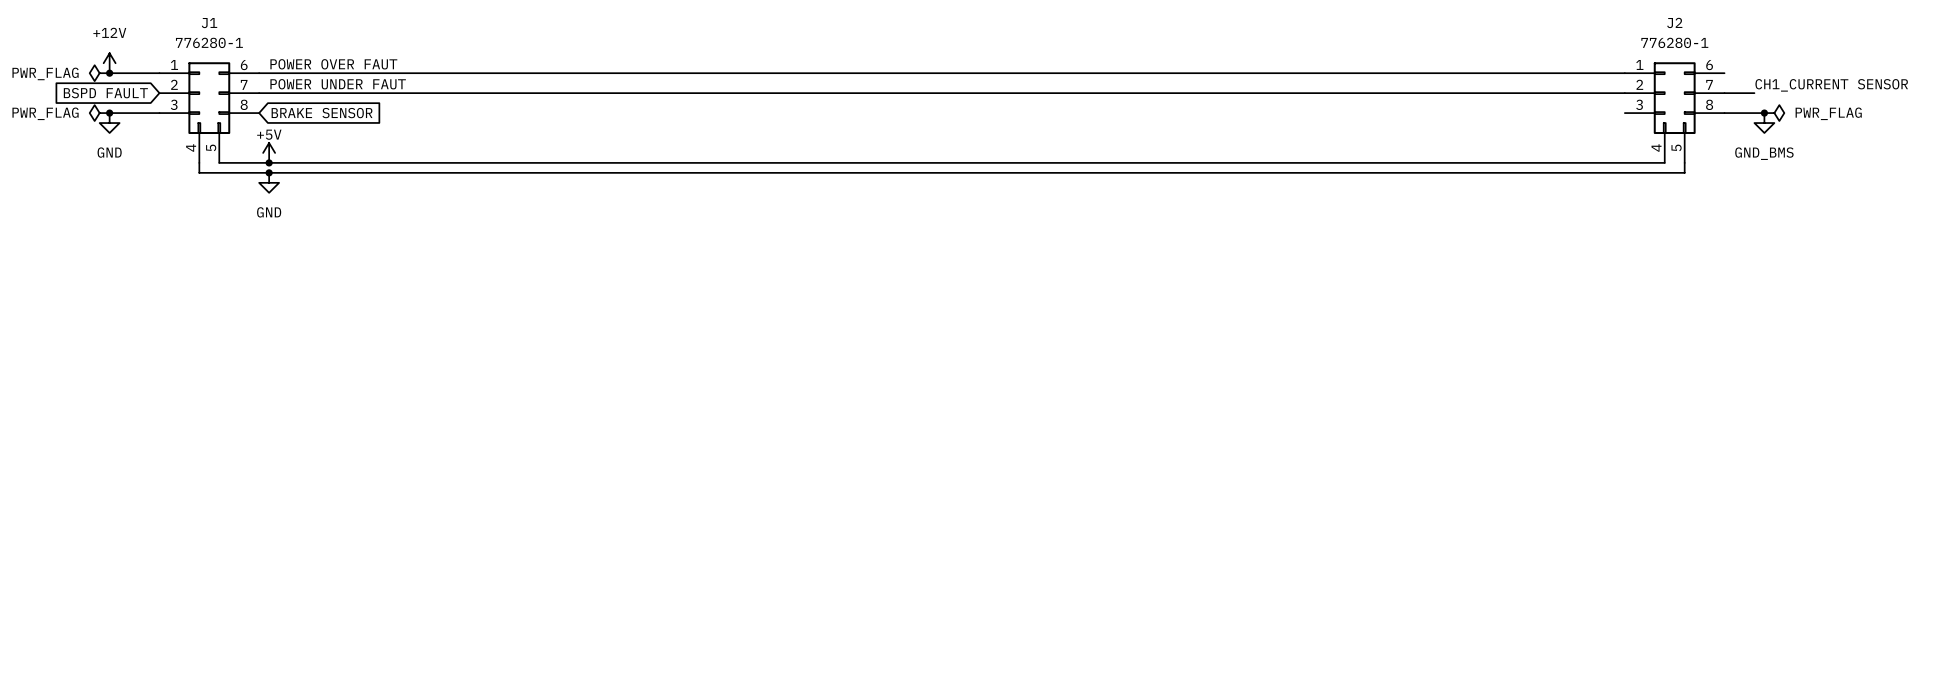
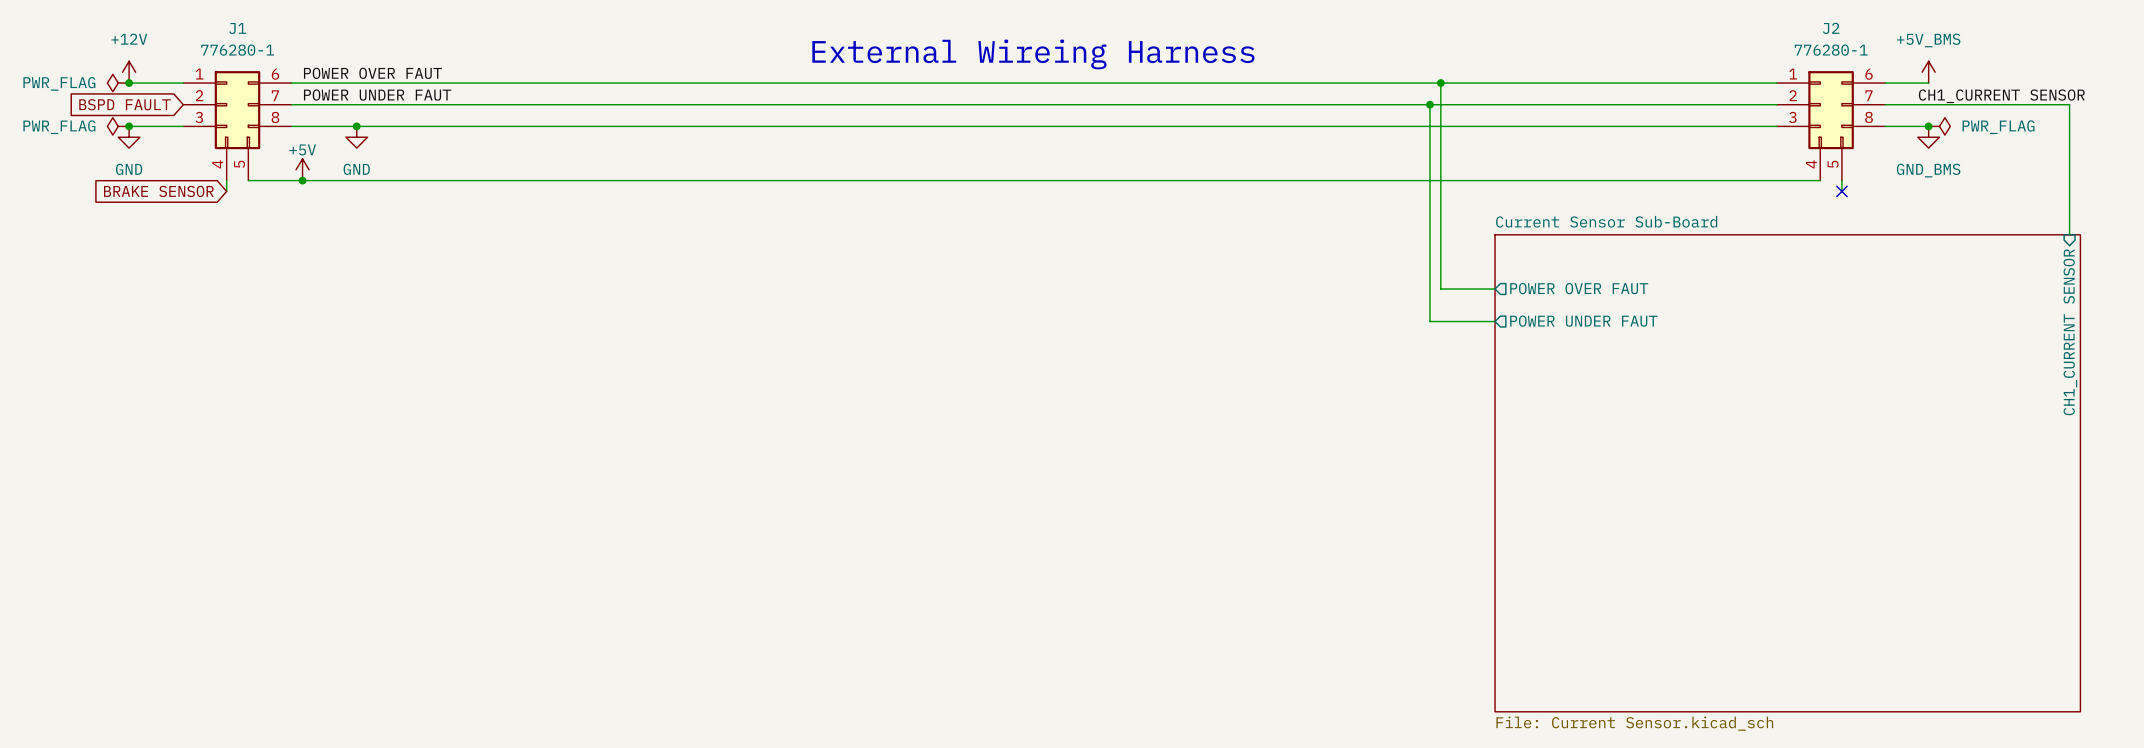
text: none -> External Wireing Harness (1033, 54)
power symbol: none -> +5V_BMS (1928, 72)
wire: none -> (1440, 83) (1440, 289) (1495, 289)
junction: none -> (1440, 83)
wire: none -> (1885, 83) (1928, 83)
wire: none -> (1429, 104) (1429, 321) (1495, 321)
junction: none -> (1429, 104)
wire: none -> (1917, 104) (2069, 104) (2069, 234)
wire: none -> (291, 126) (1776, 126)
junction: none -> (356, 126)
global label rotation: 0° (322, 113) -> 180° (158, 191)
global label position: BRAKE SENSOR (322, 113) -> BRAKE SENSOR (158, 191)
wire: (199, 172) (1684, 172) -> none
junction: (269, 172) -> none
no-connect mark: none -> (1841, 191)
power symbol position: GND (269, 182) -> GND (356, 137)
sheet pin: none -> POWER OVER FAUT (1579, 288)
sheet pin: none -> POWER UNDER FAUT (1583, 321)
sheet pin: none -> CH1_CURRENT SENSOR (2070, 332)
sheet Current Sensor Sub-Board: none -> File: Current Sensor.kicad_sch (1787, 473)

